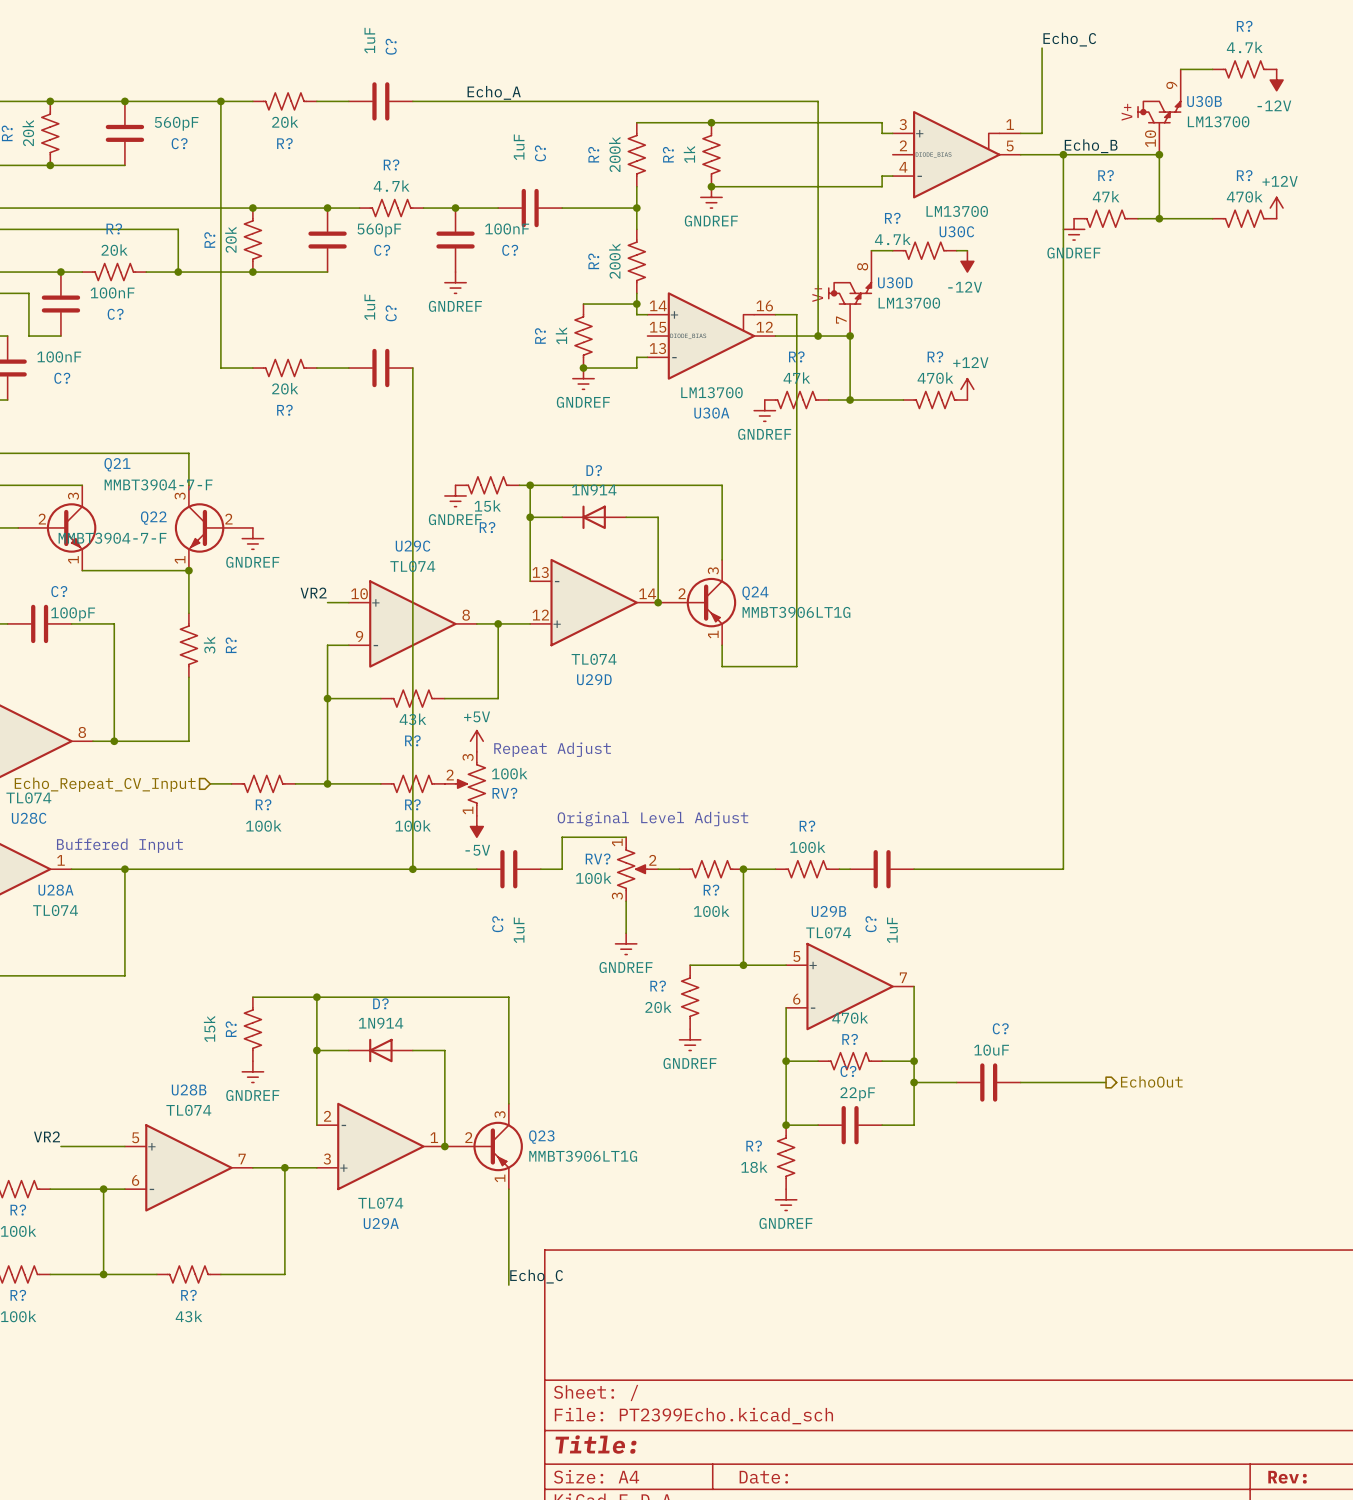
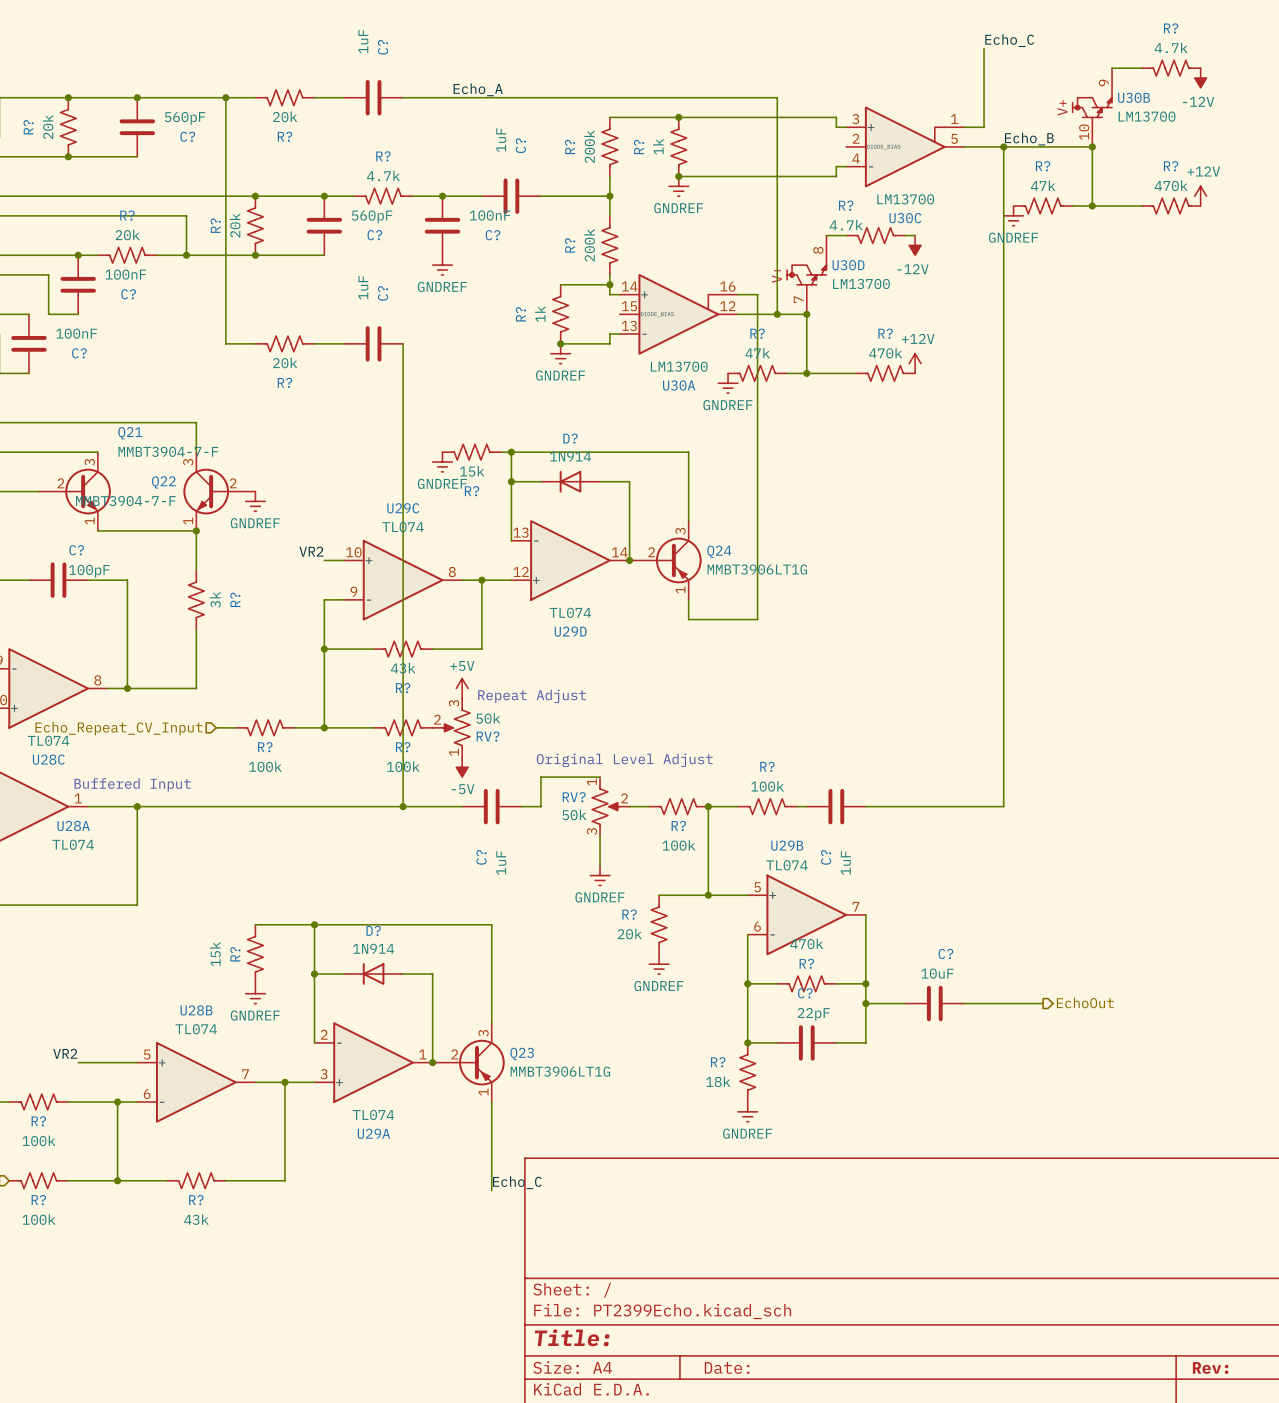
RV? value: 100k (509, 773) -> 50k (488, 718)
RV? value: 100k (593, 878) -> 50k (574, 814)

